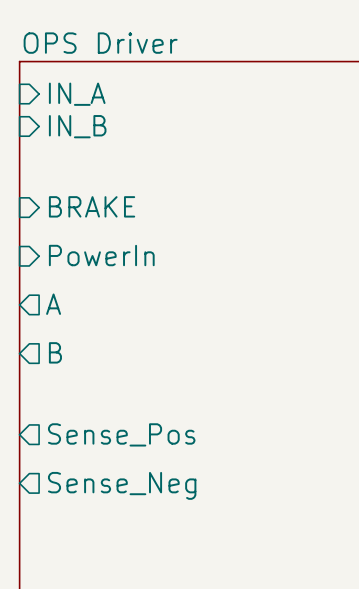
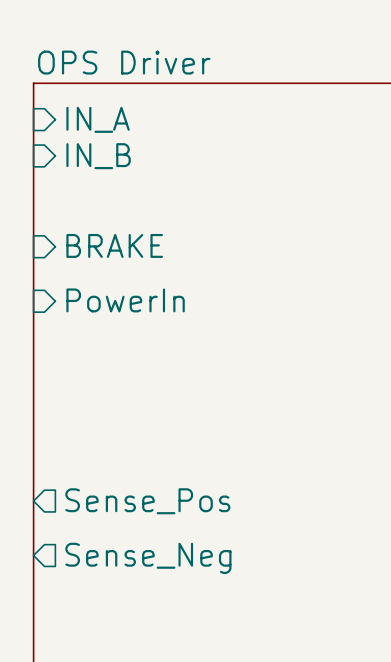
sheet pin: A (53, 304) -> none
sheet pin: B (55, 352) -> none

